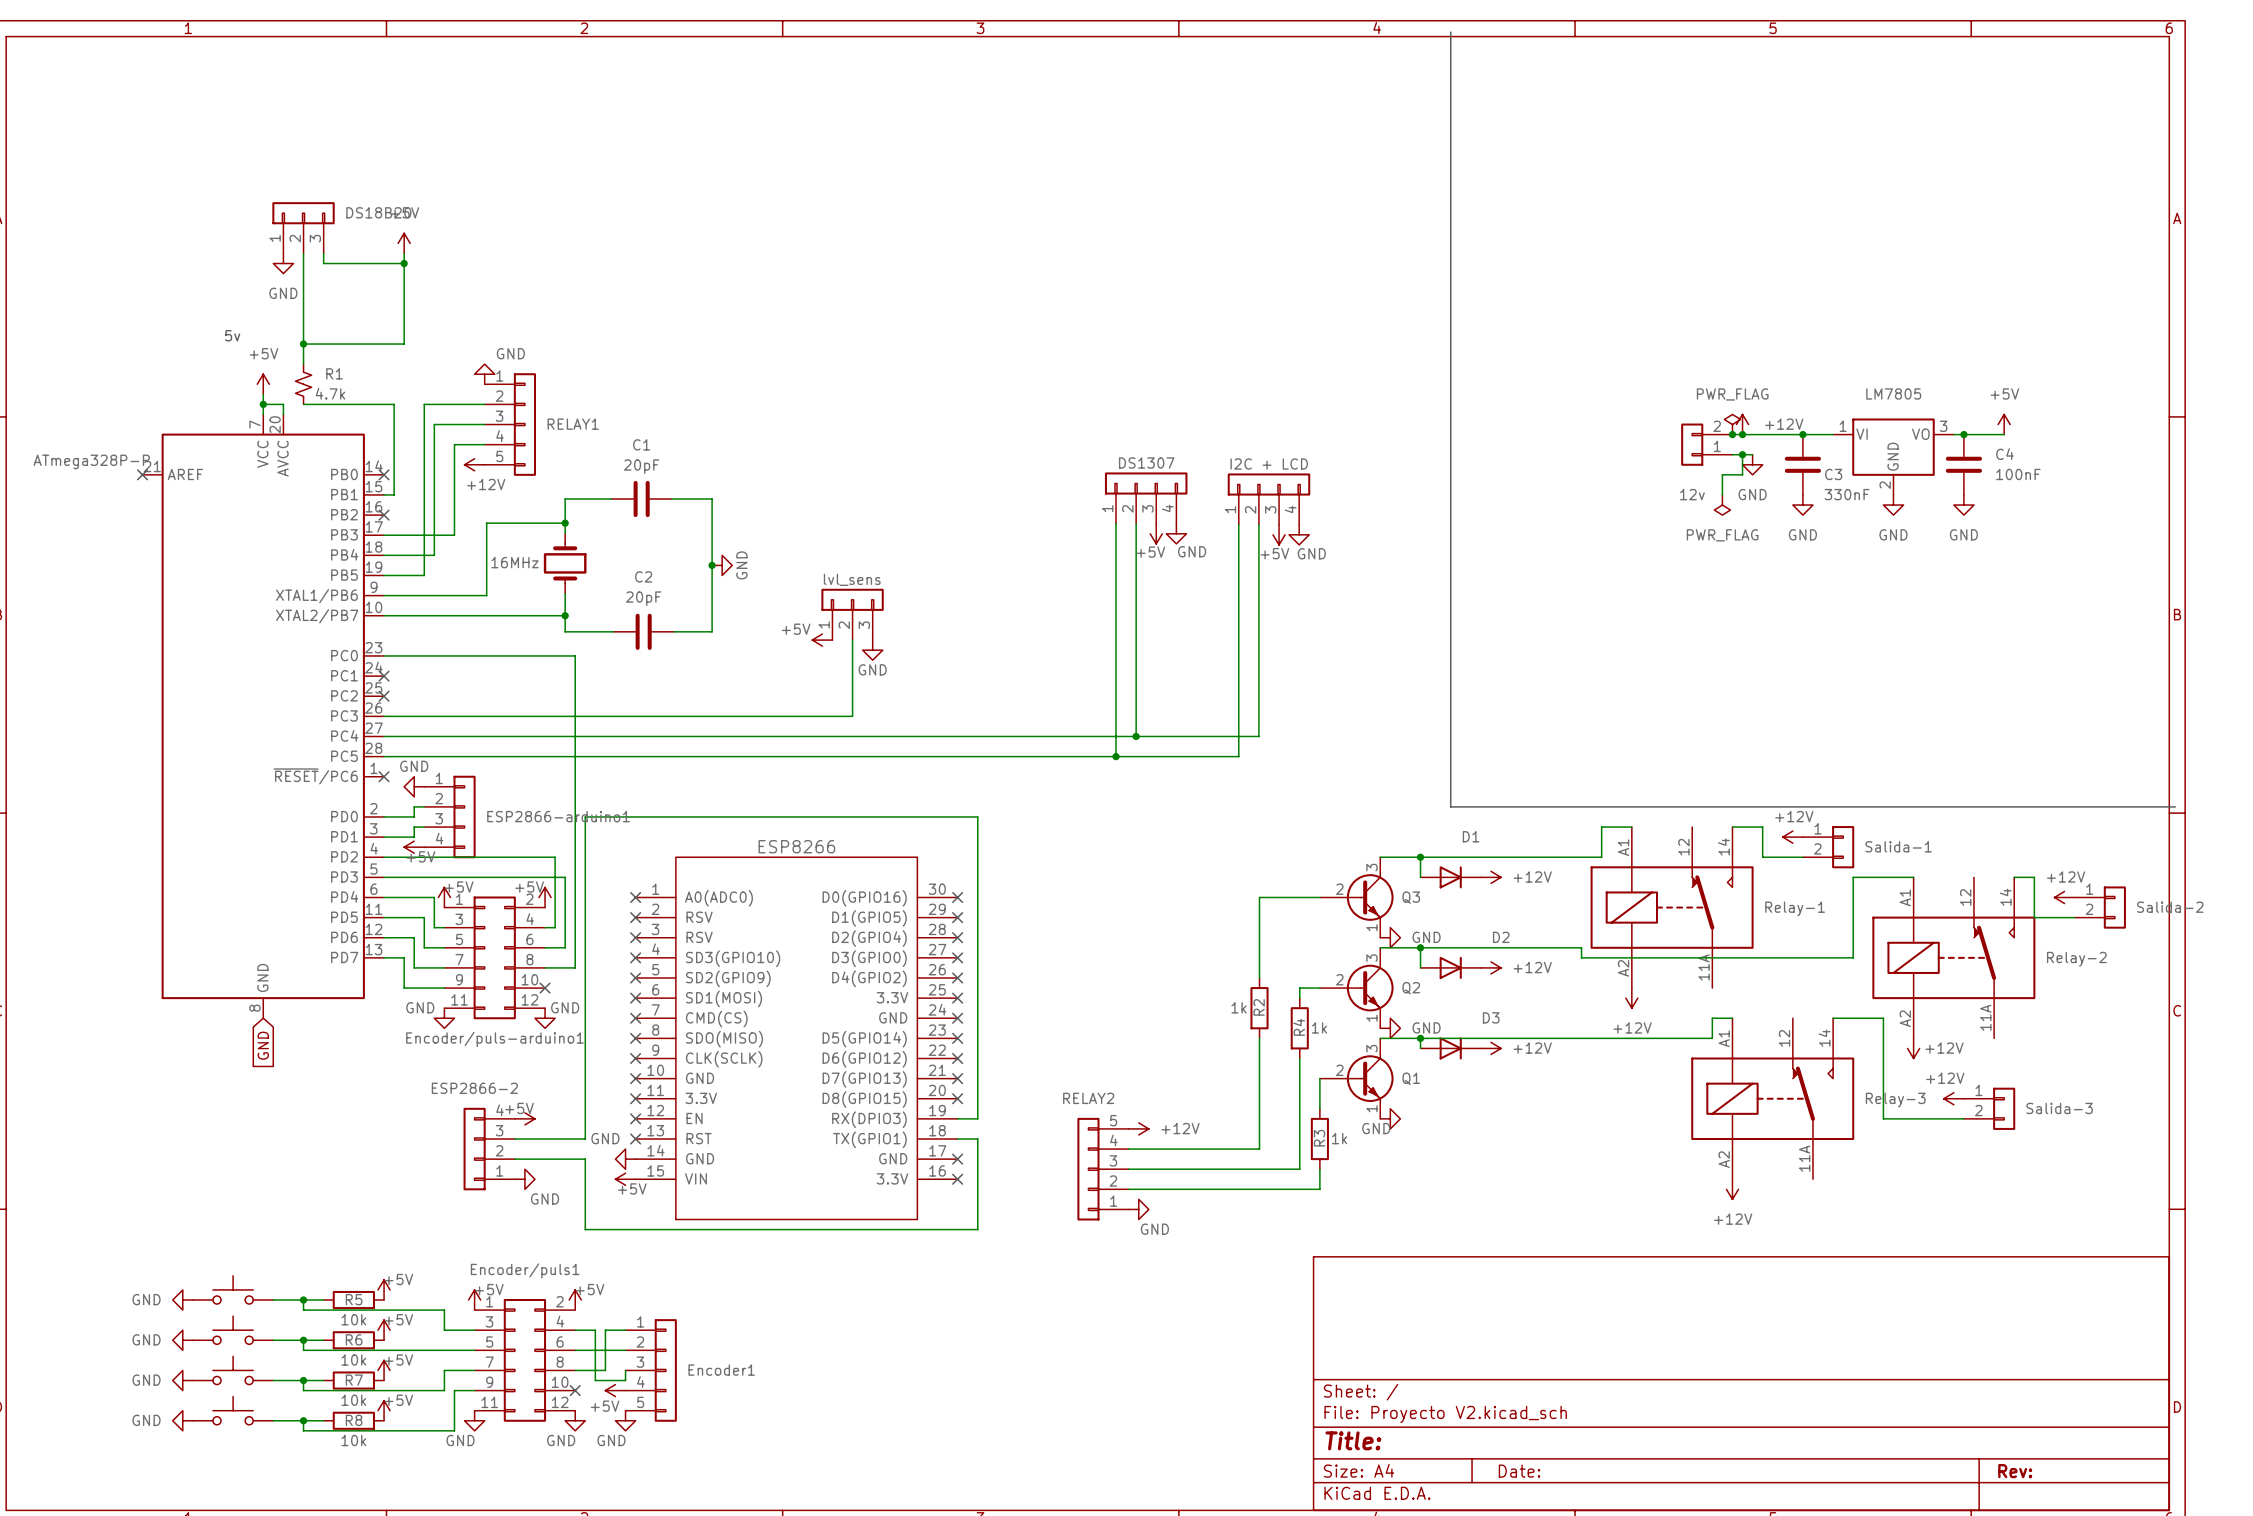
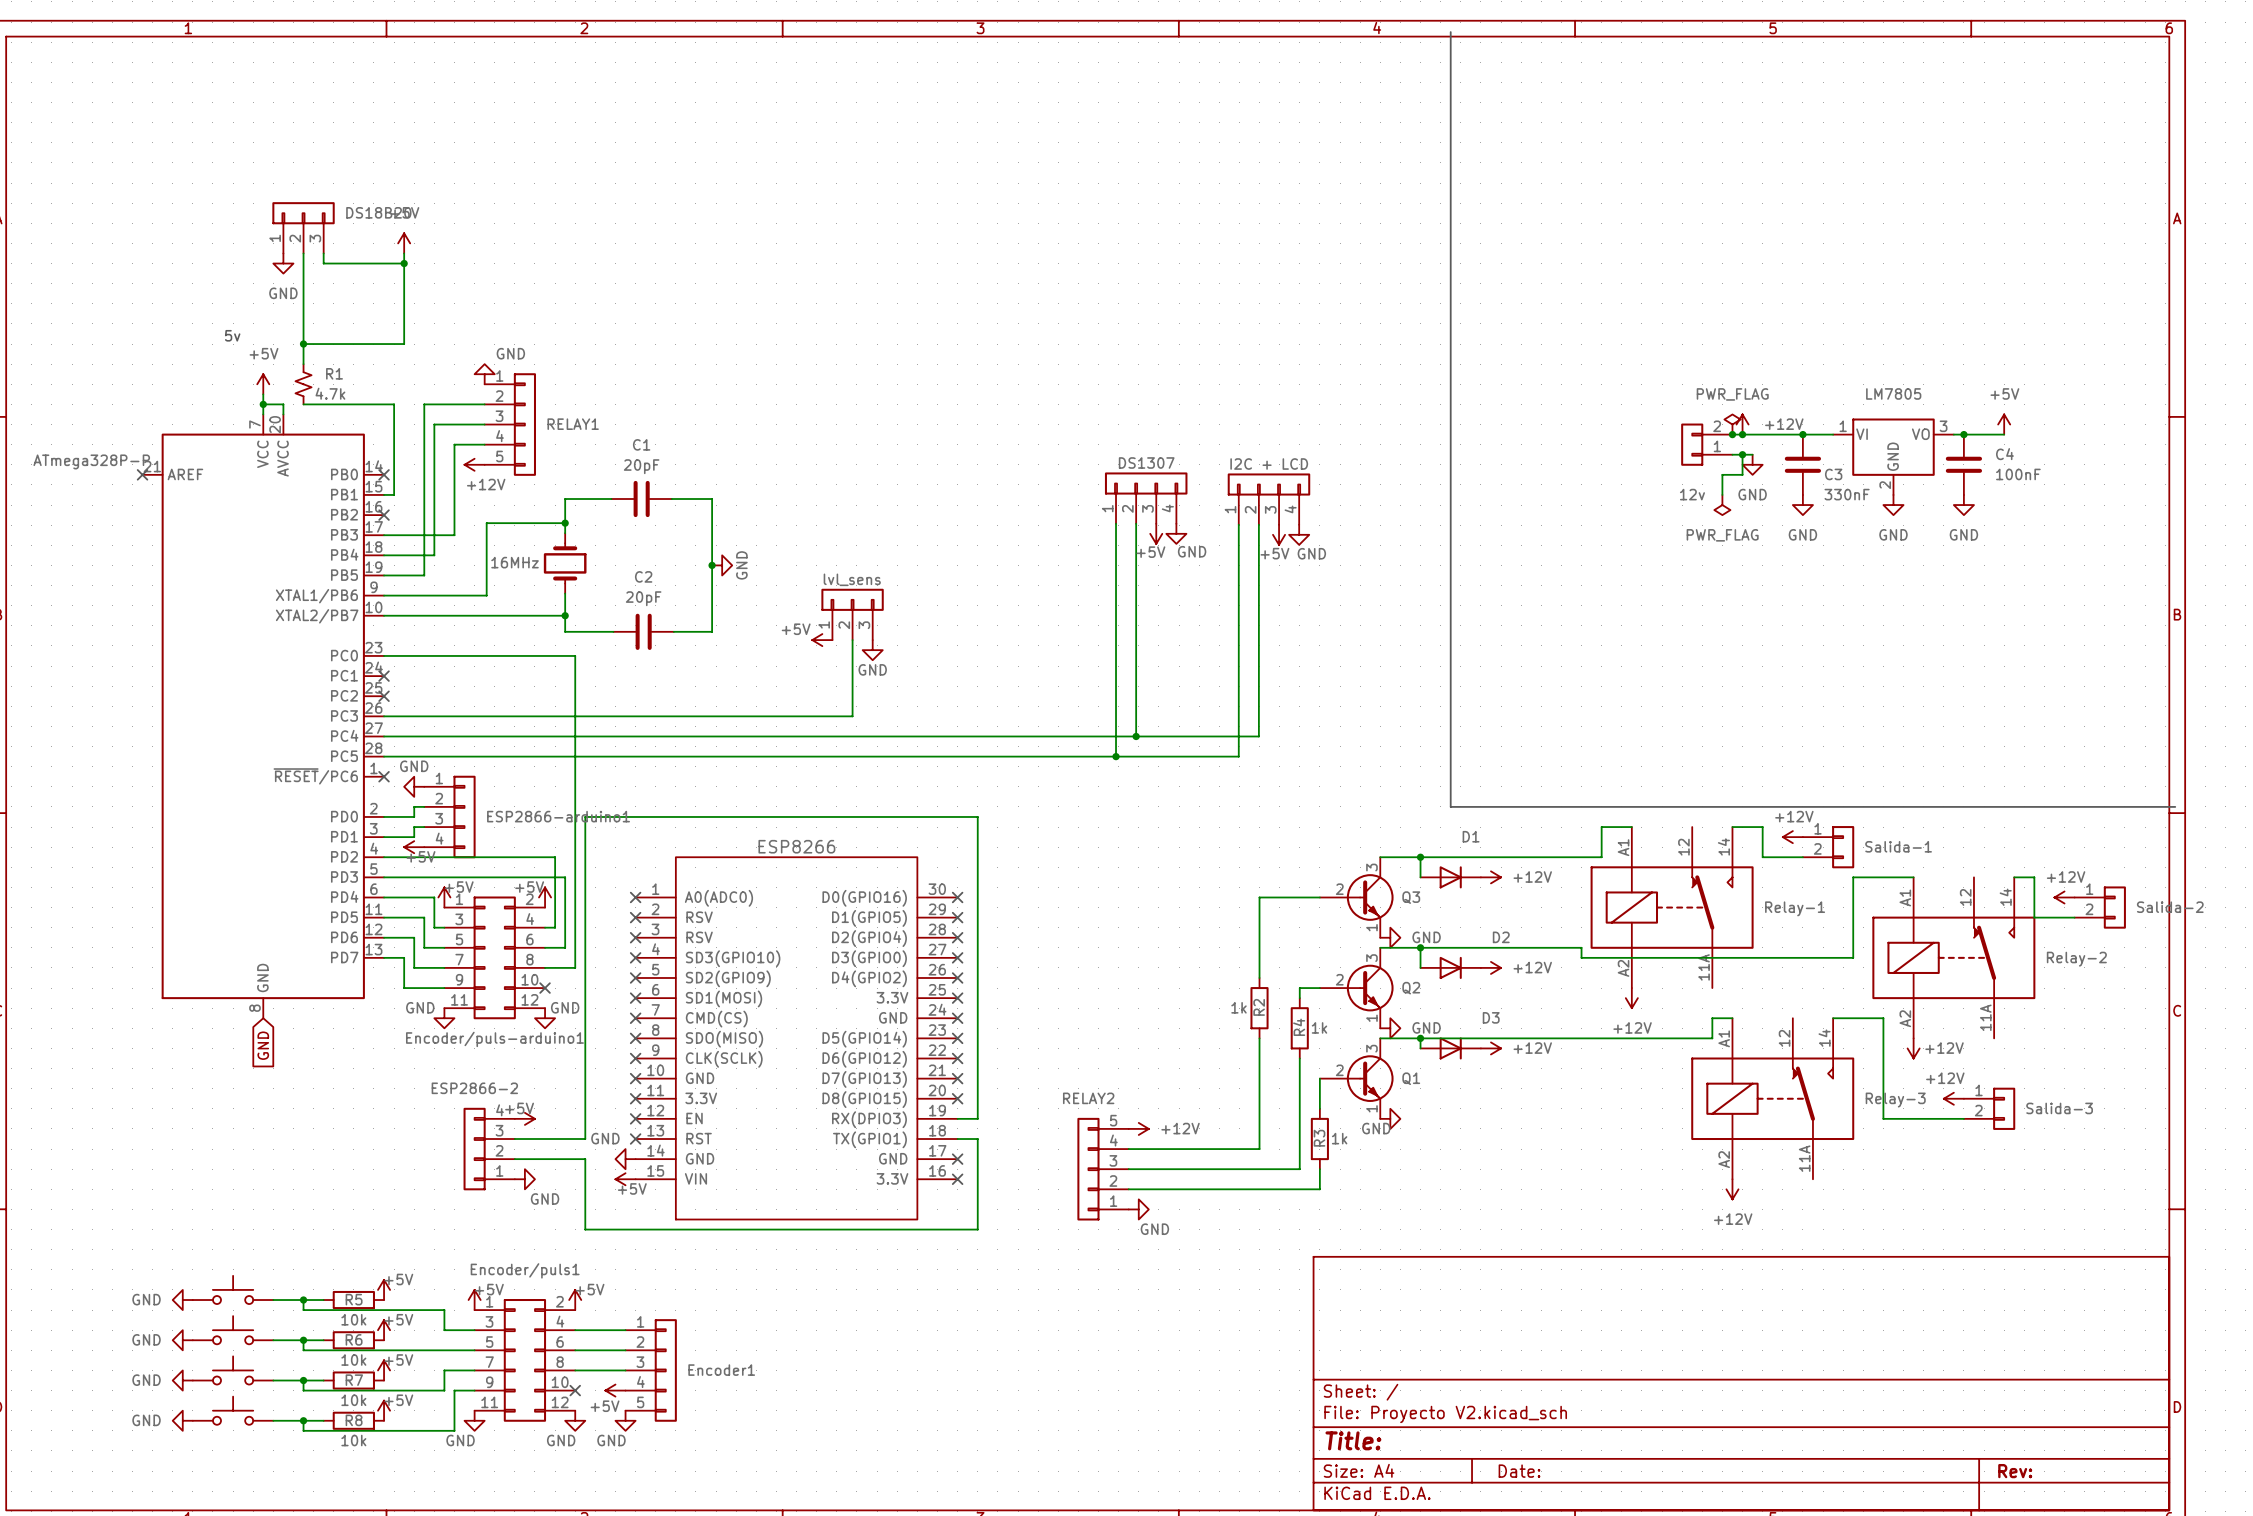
wire: (595, 1330) (595, 1380) (625, 1380) (625, 1370) -> (605, 1370) (625, 1370)
wire: (605, 1330) (605, 1370) -> (605, 1330) (595, 1330)

